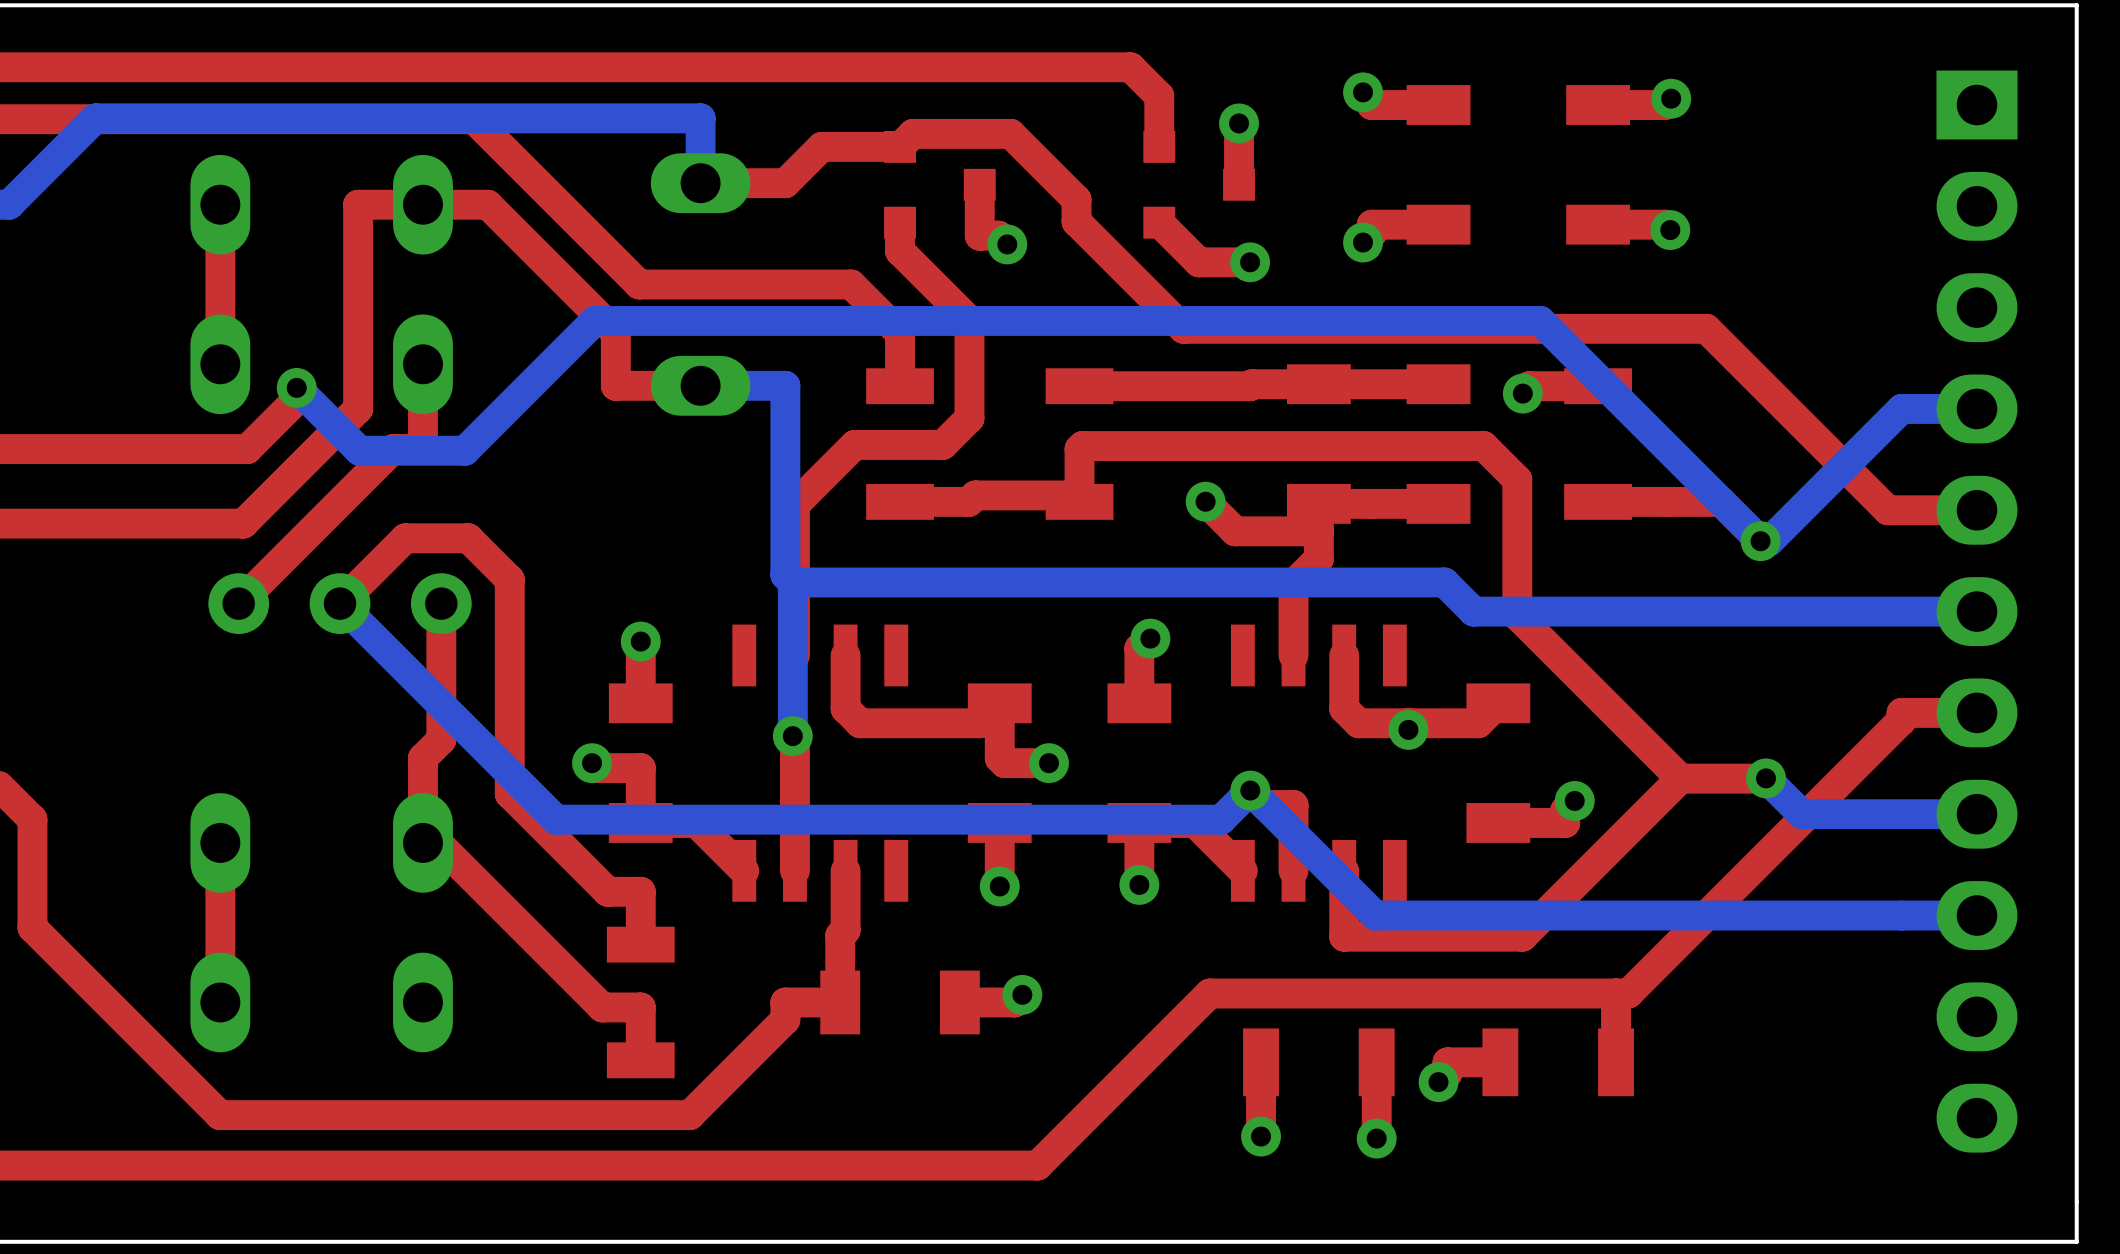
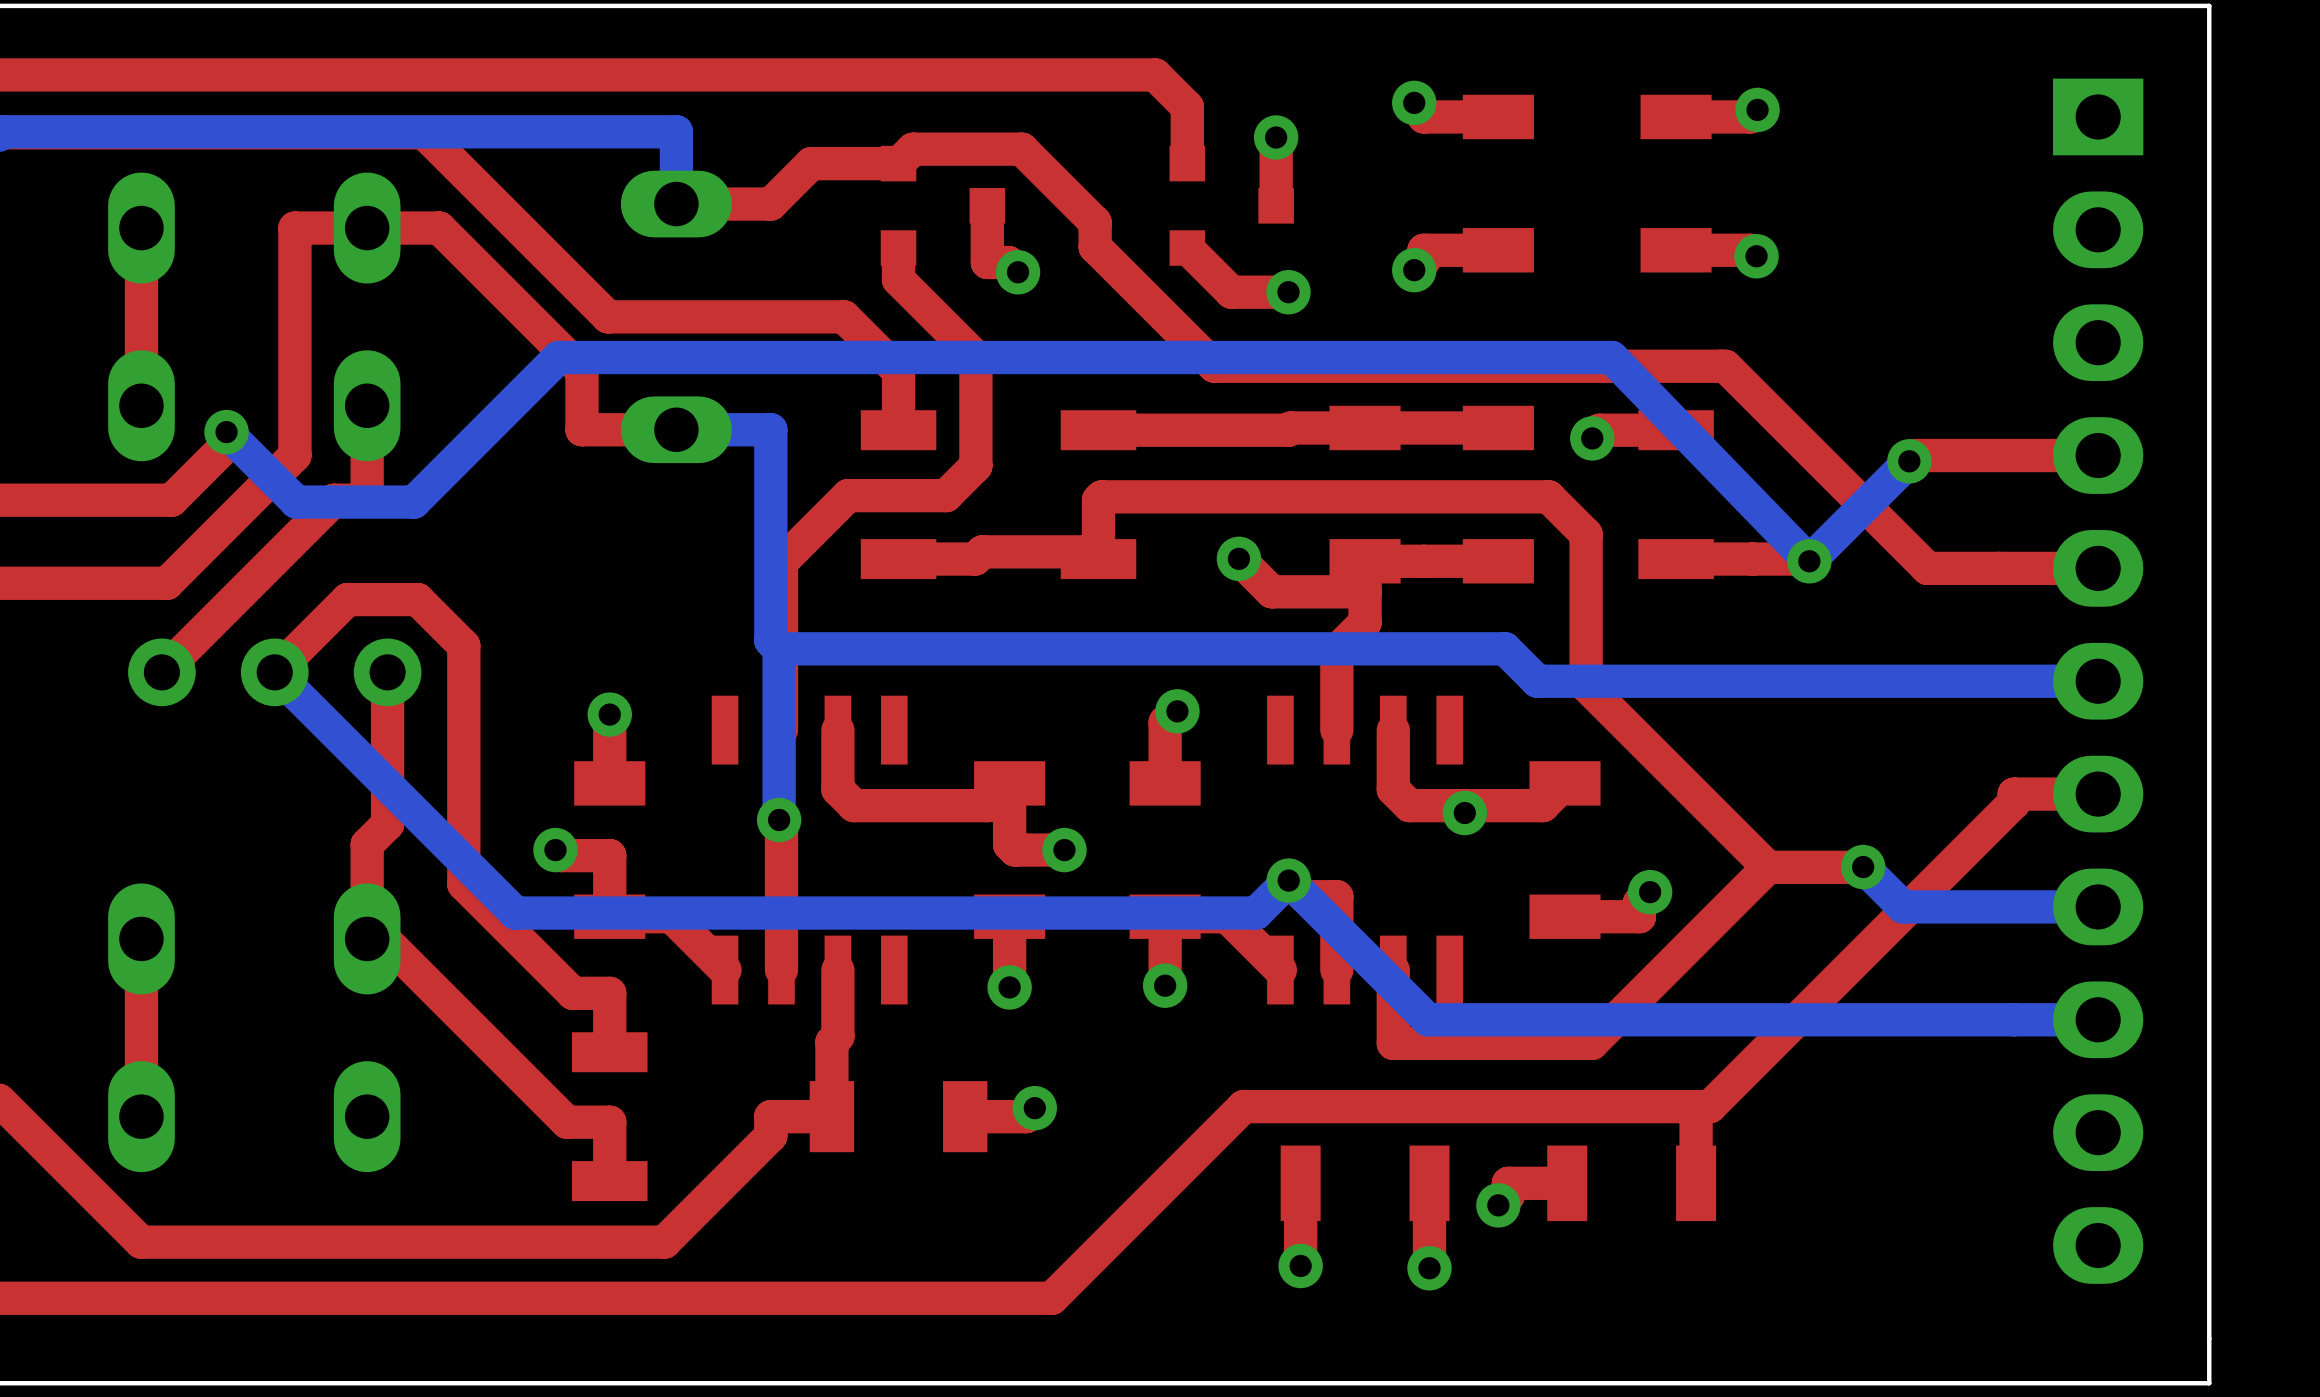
bottom track: (1540, 320) (1760, 541) (1769, 541) (1901, 408) (1977, 408) -> (1611, 357) (1809, 561) (1909, 461)
top track: (1642, 328) (1706, 328) (1887, 510) -> (1725, 366) (1927, 568) (1998, 568)
top track: none -> (2098, 455) (1915, 455) (1909, 461)
via: none -> (1909, 461)
via position: (1760, 541) -> (1809, 561)

